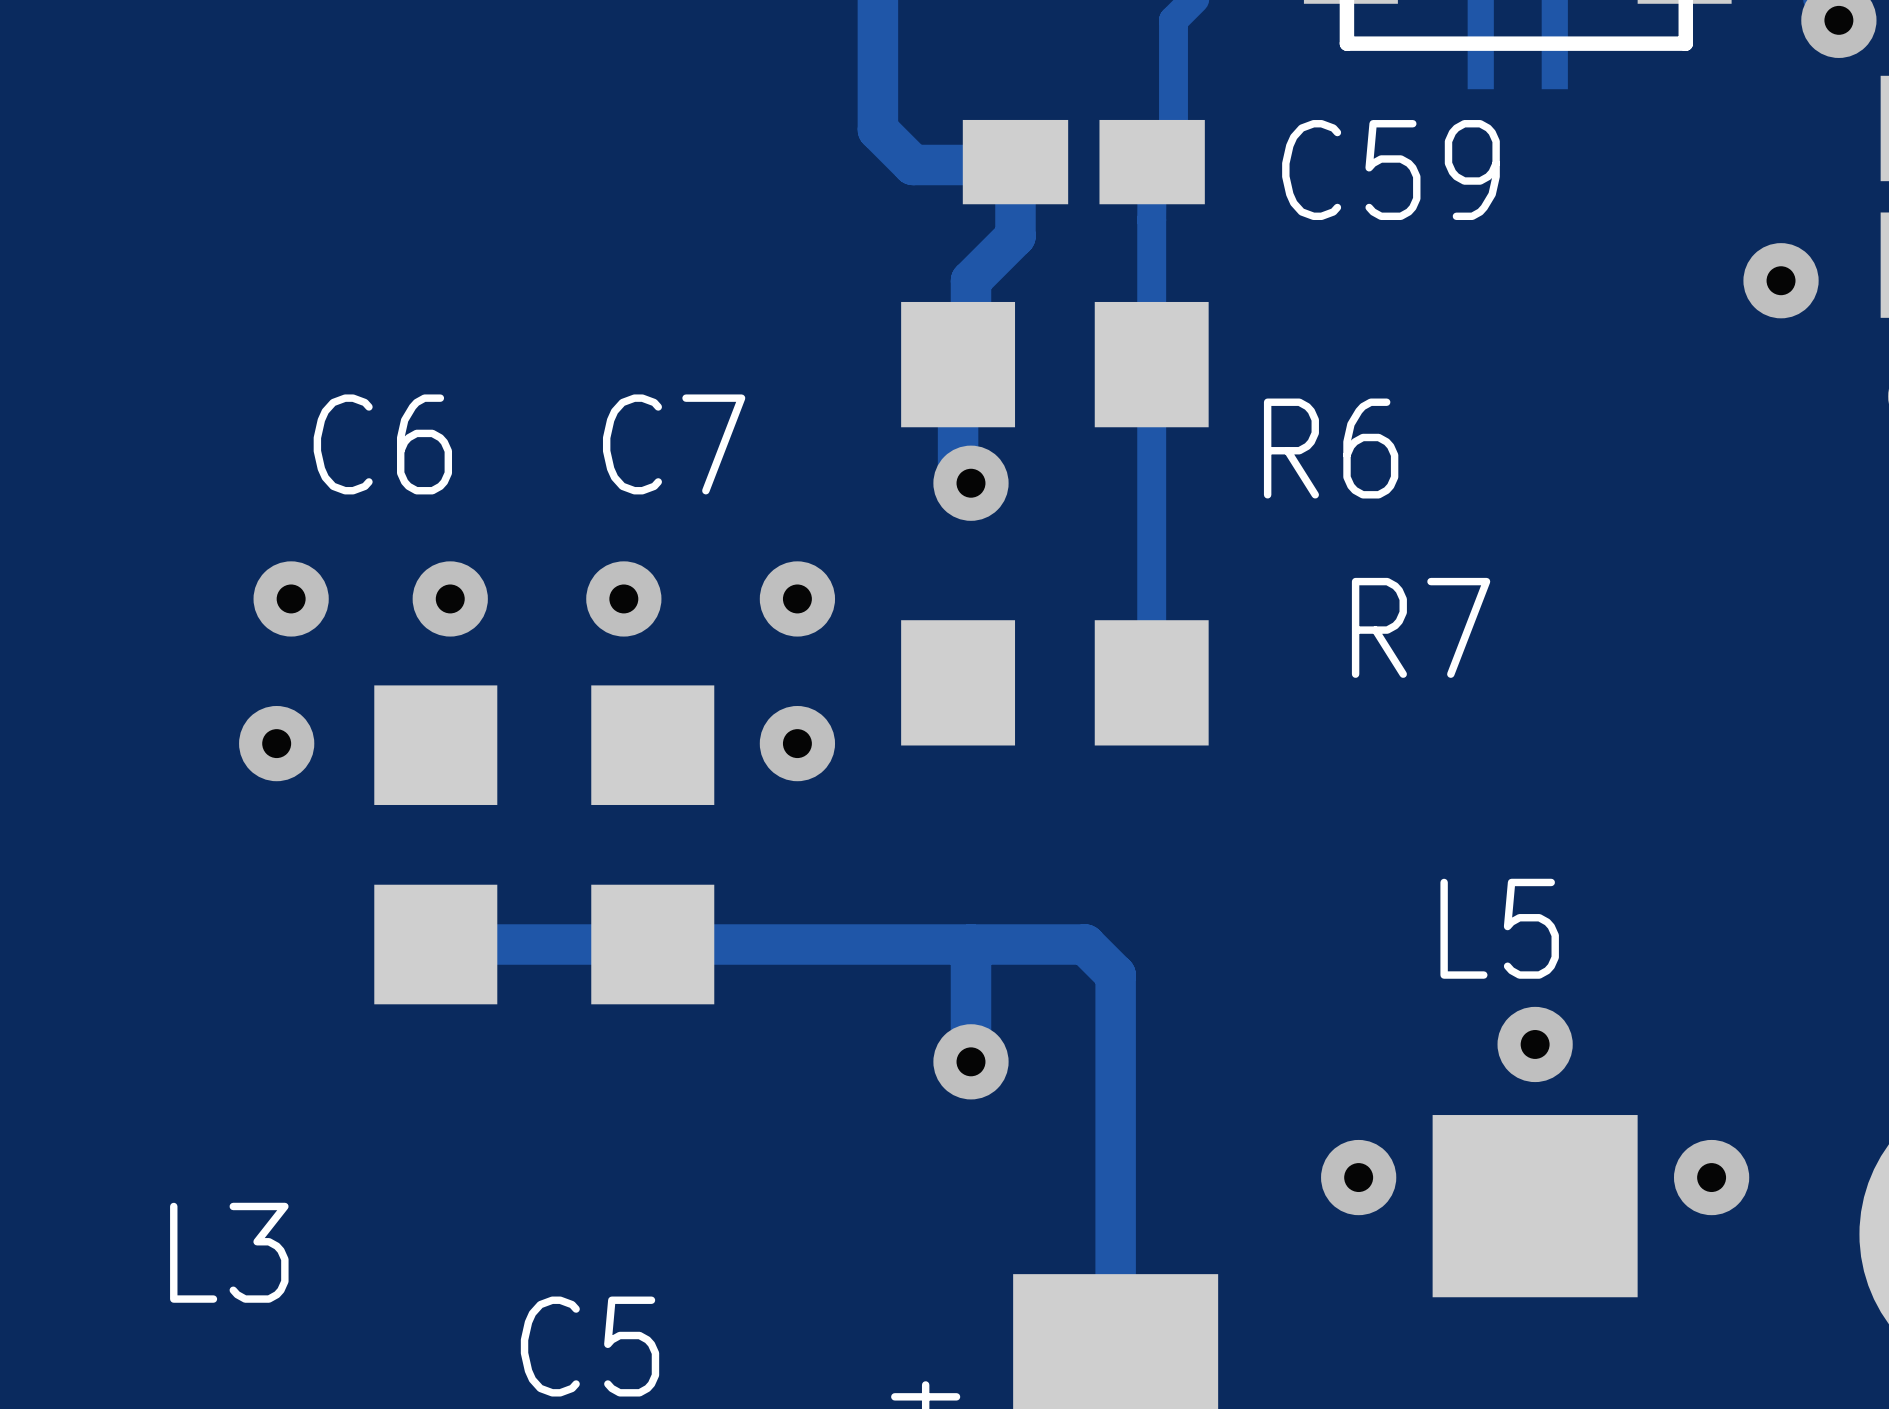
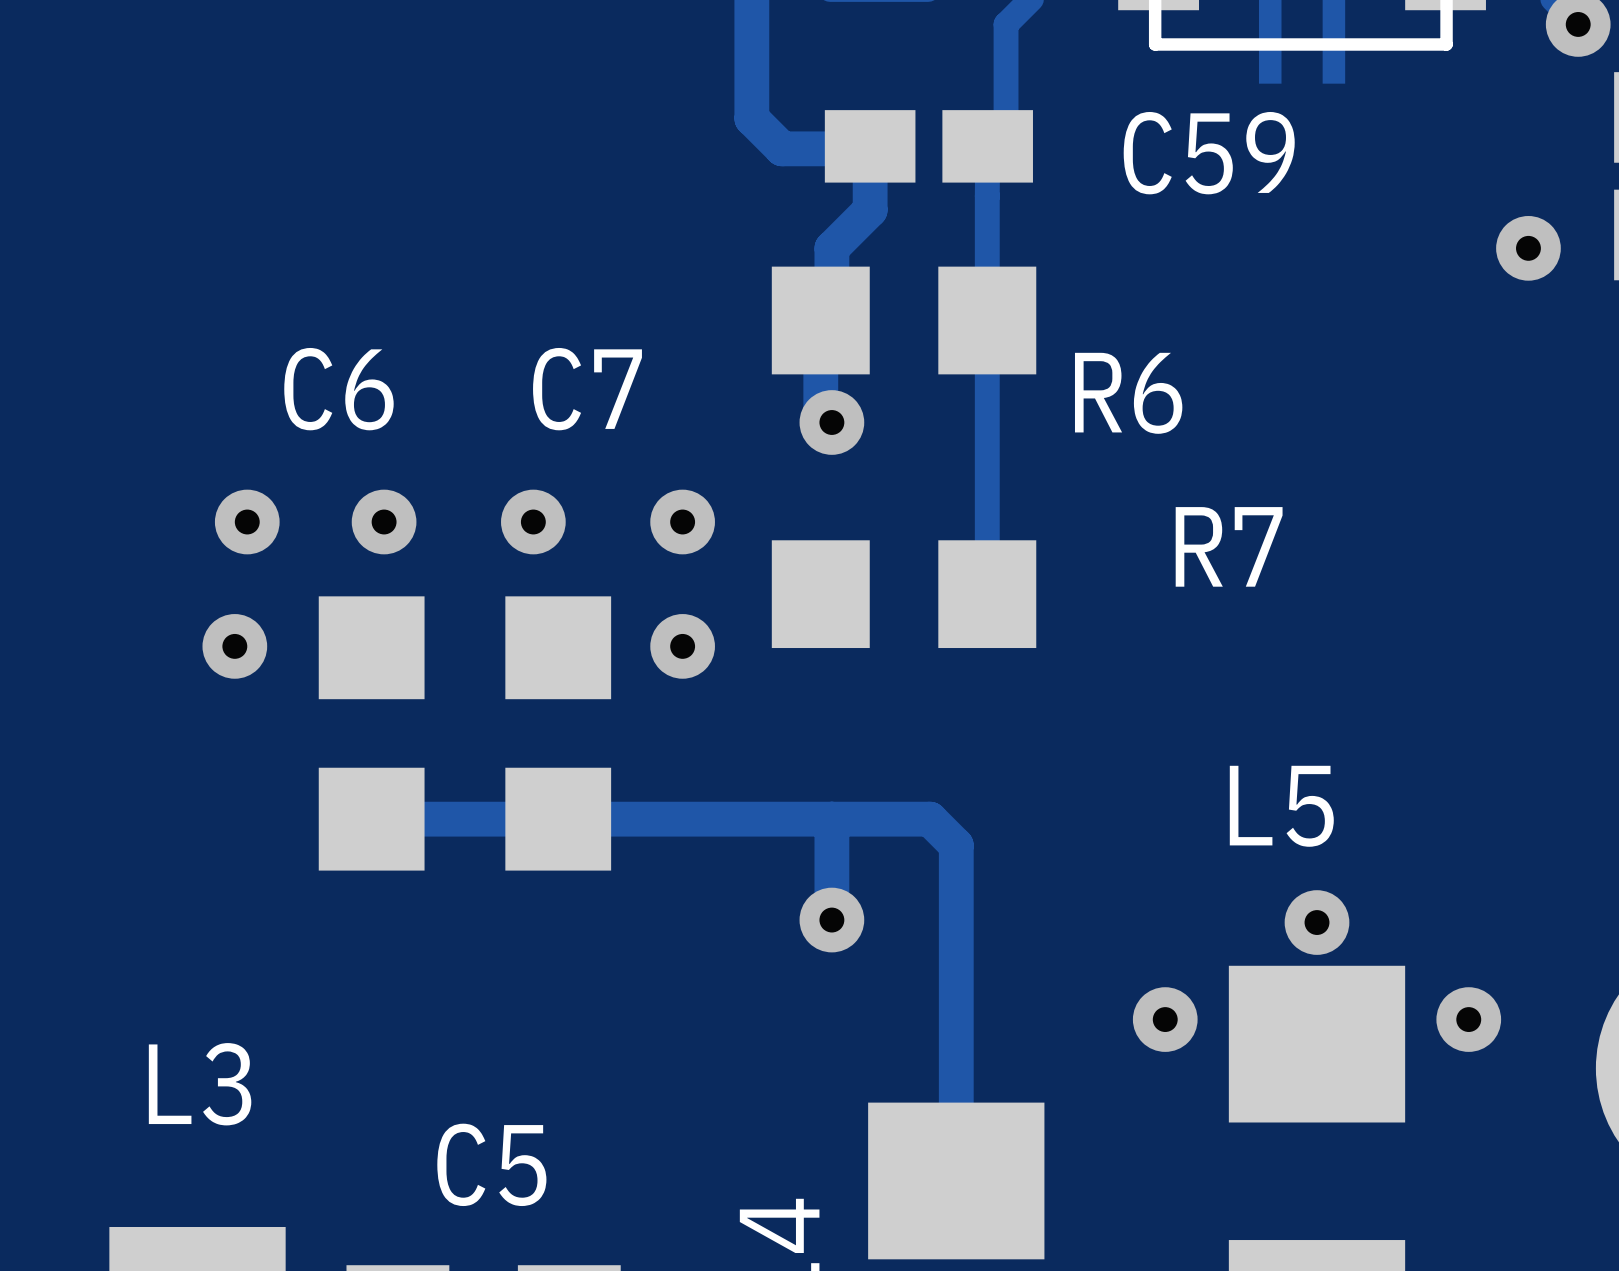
via position: (1535, 1044) -> (1317, 922)

